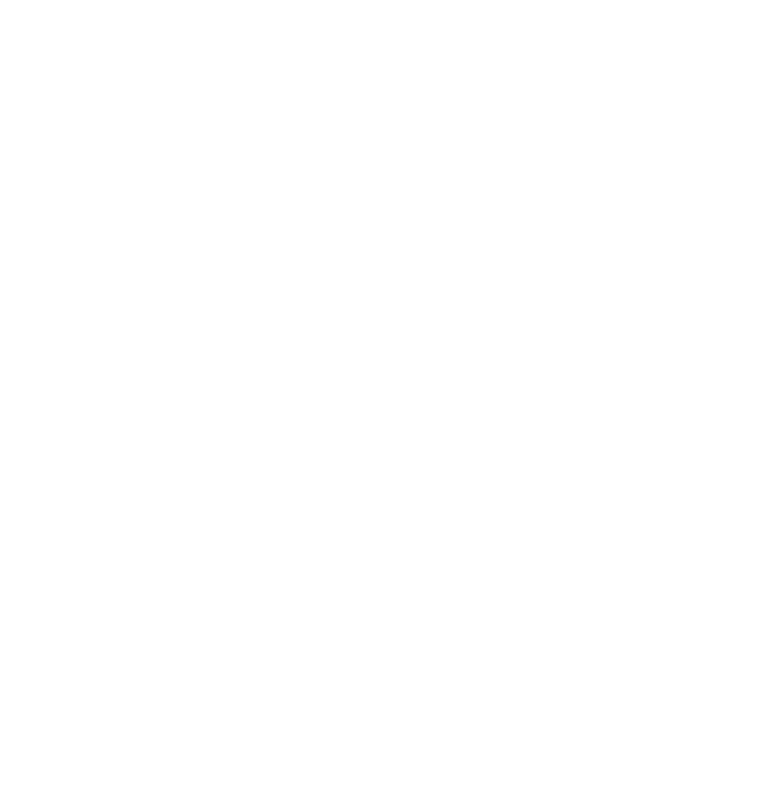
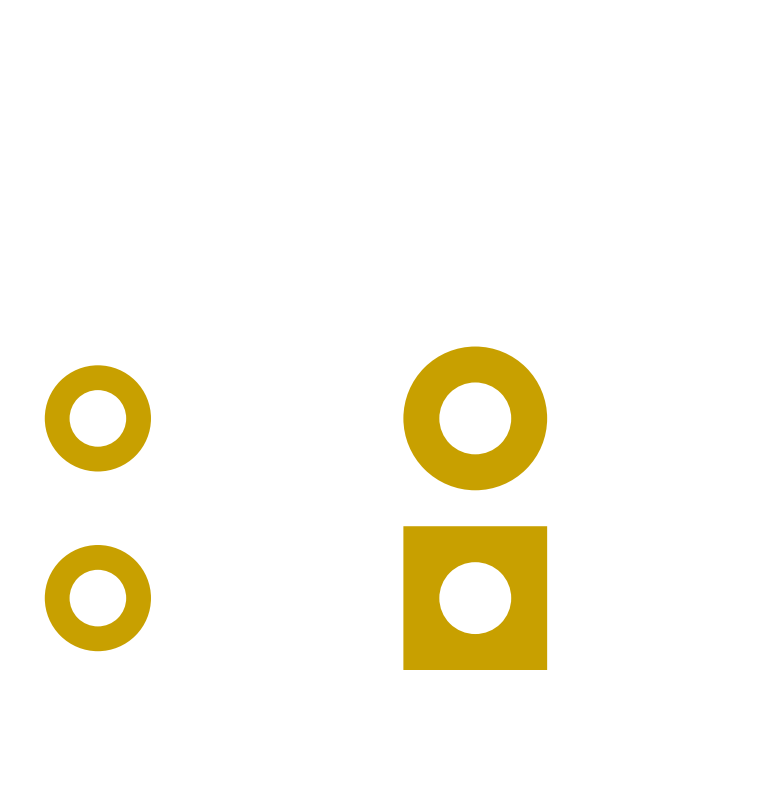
part: none -> (97, 508)
part: none -> (475, 508)

